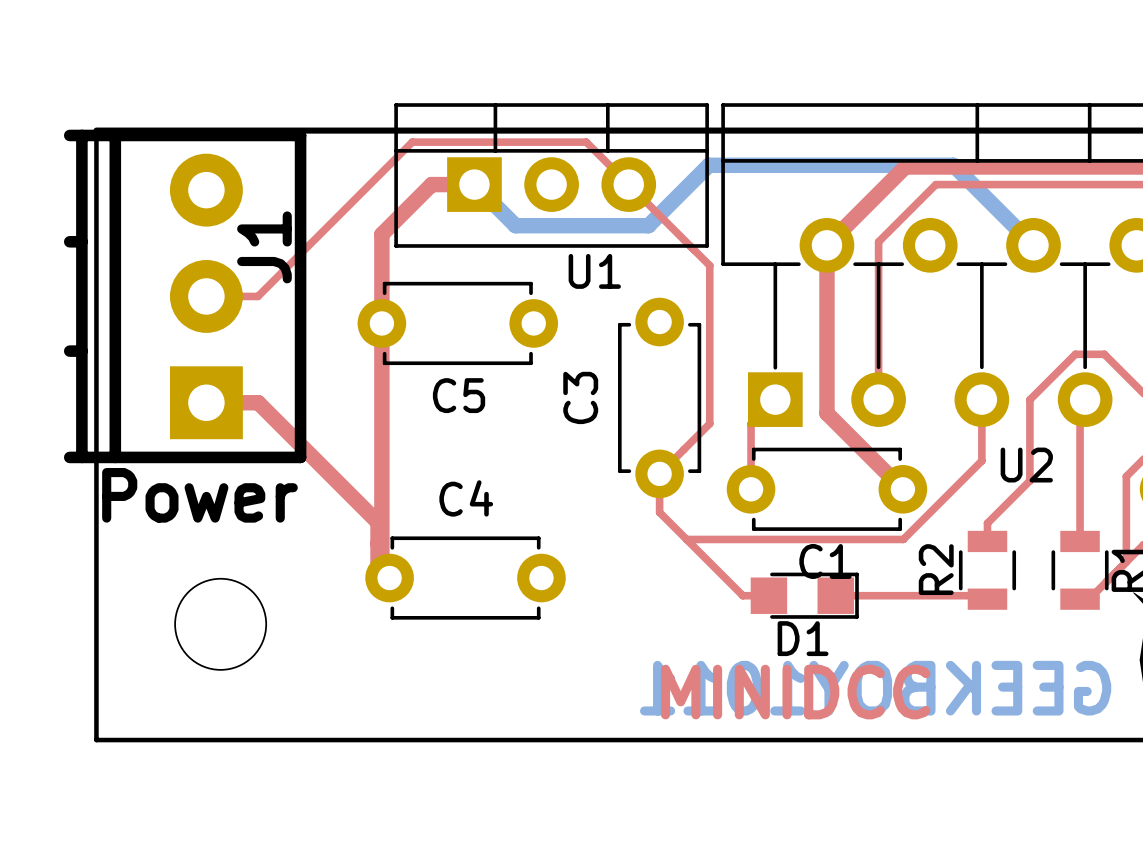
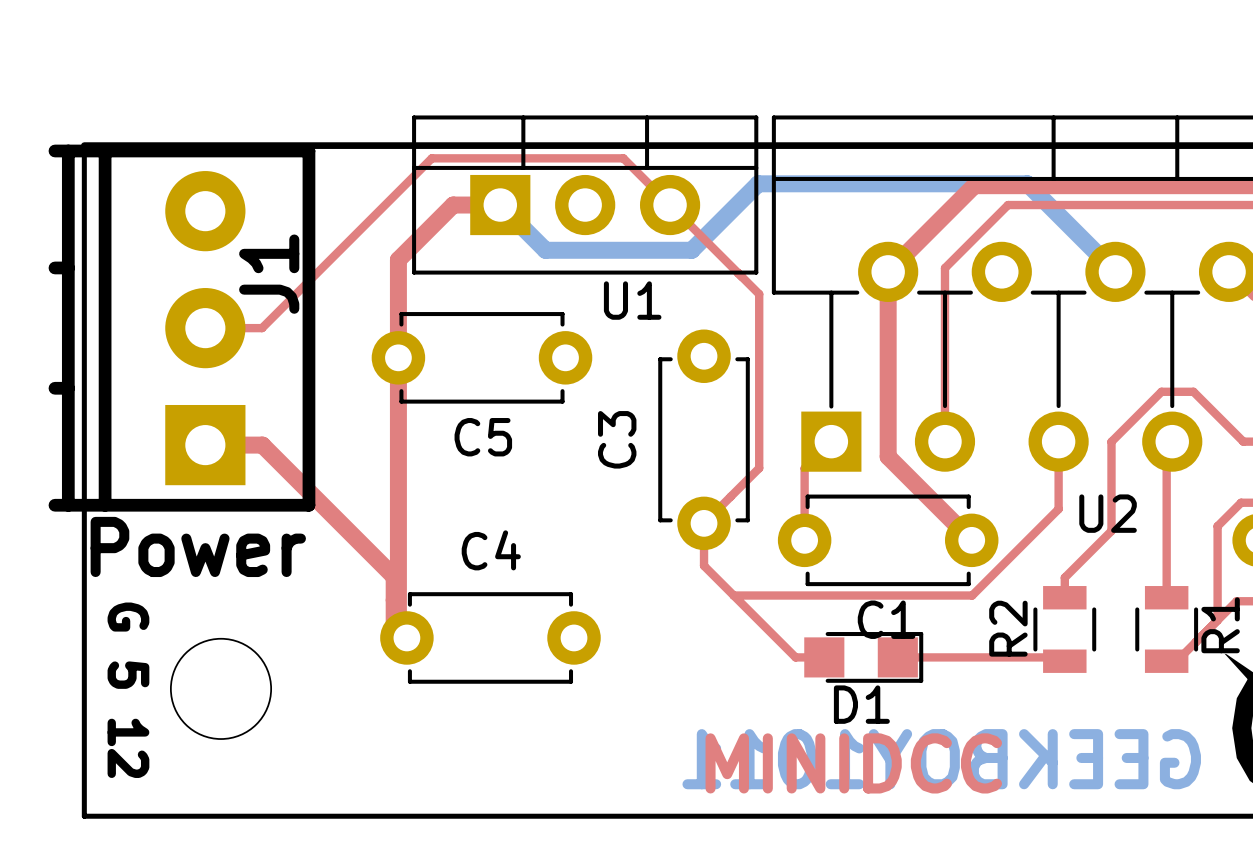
text: none -> G 5 12 (128, 690)

